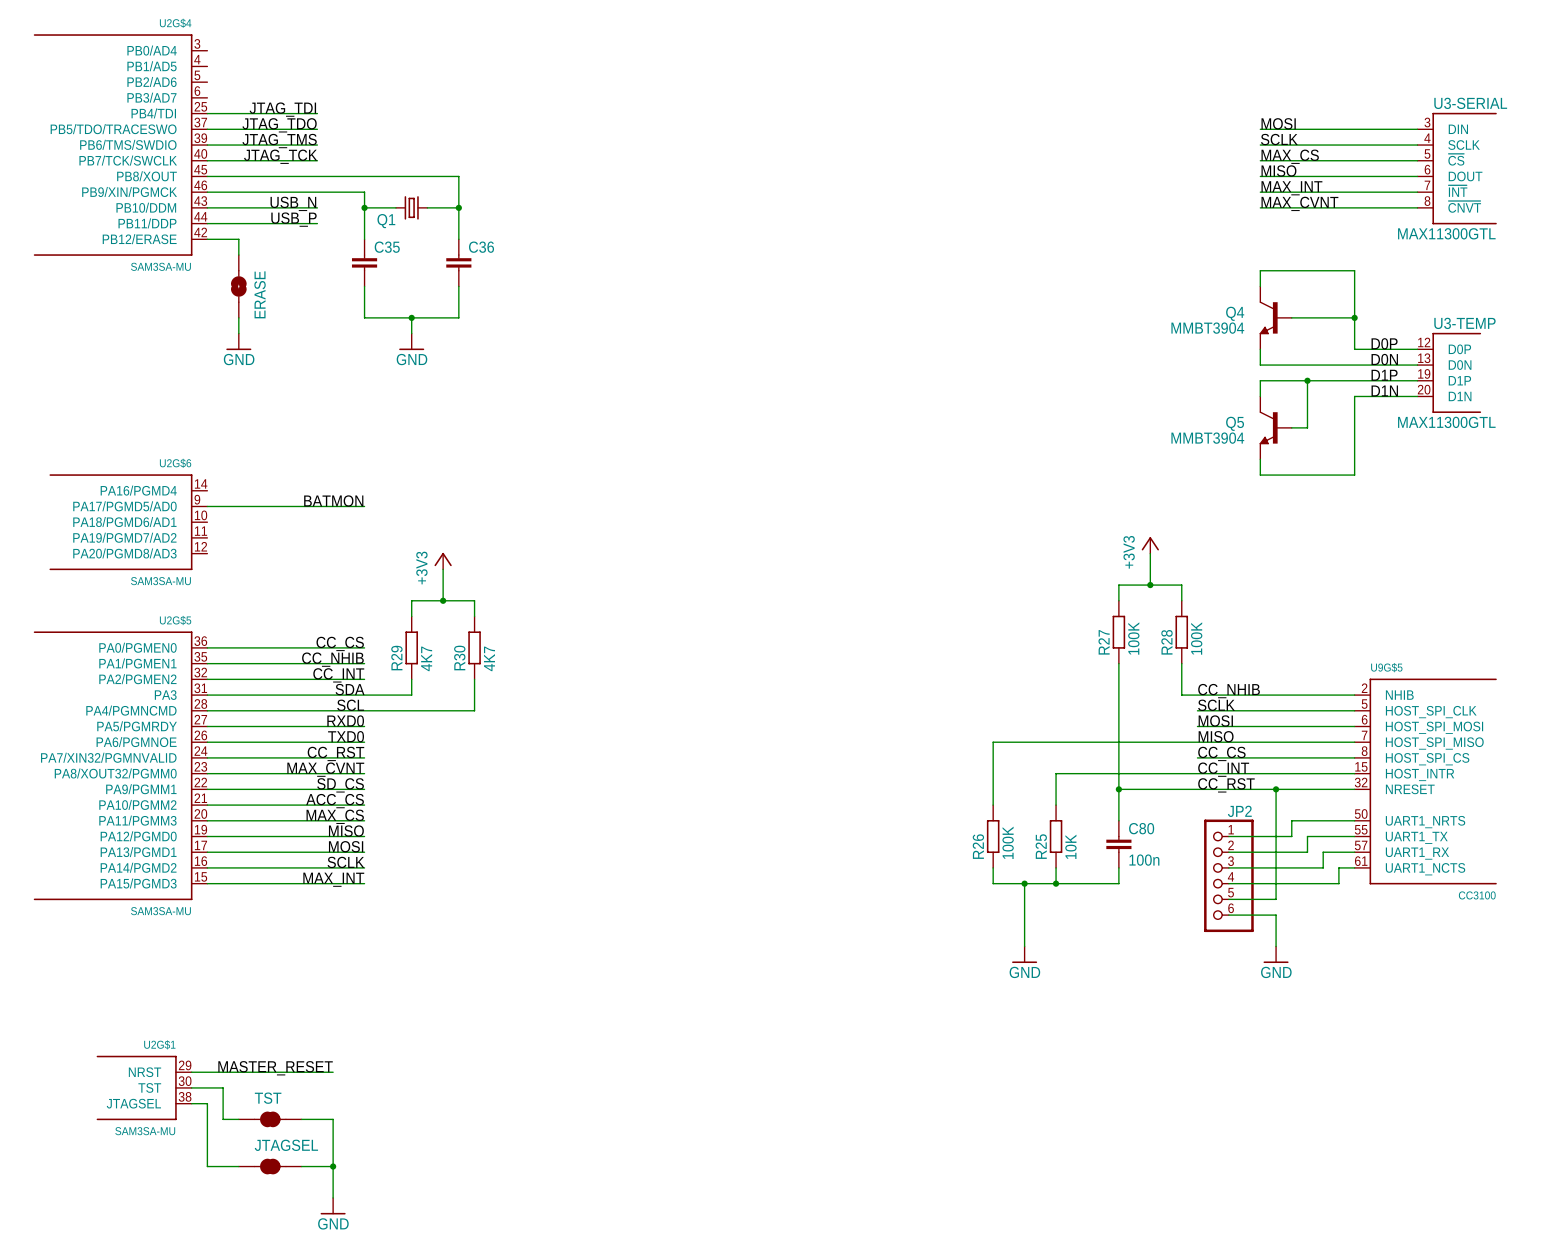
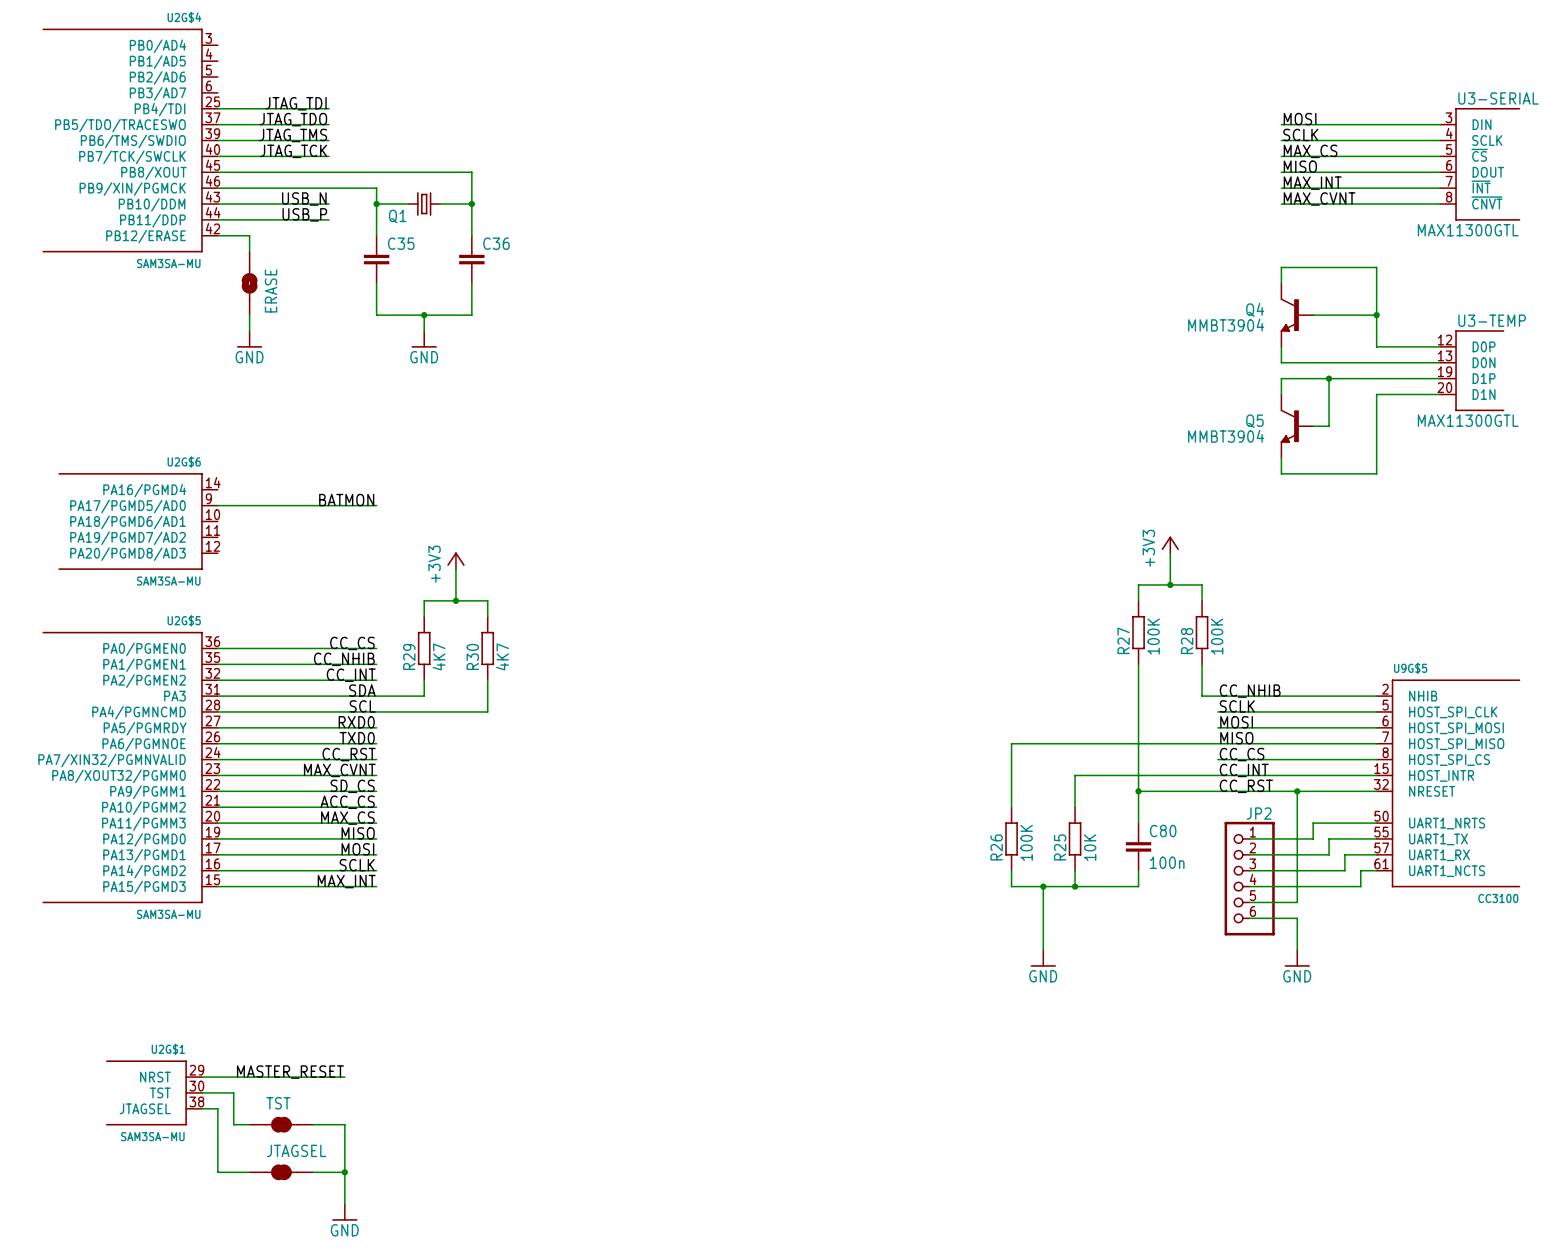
label: D0P (1384, 343) -> none
label: D0N (1384, 359) -> none
label: D1P (1384, 375) -> none
label: D1N (1384, 390) -> none

